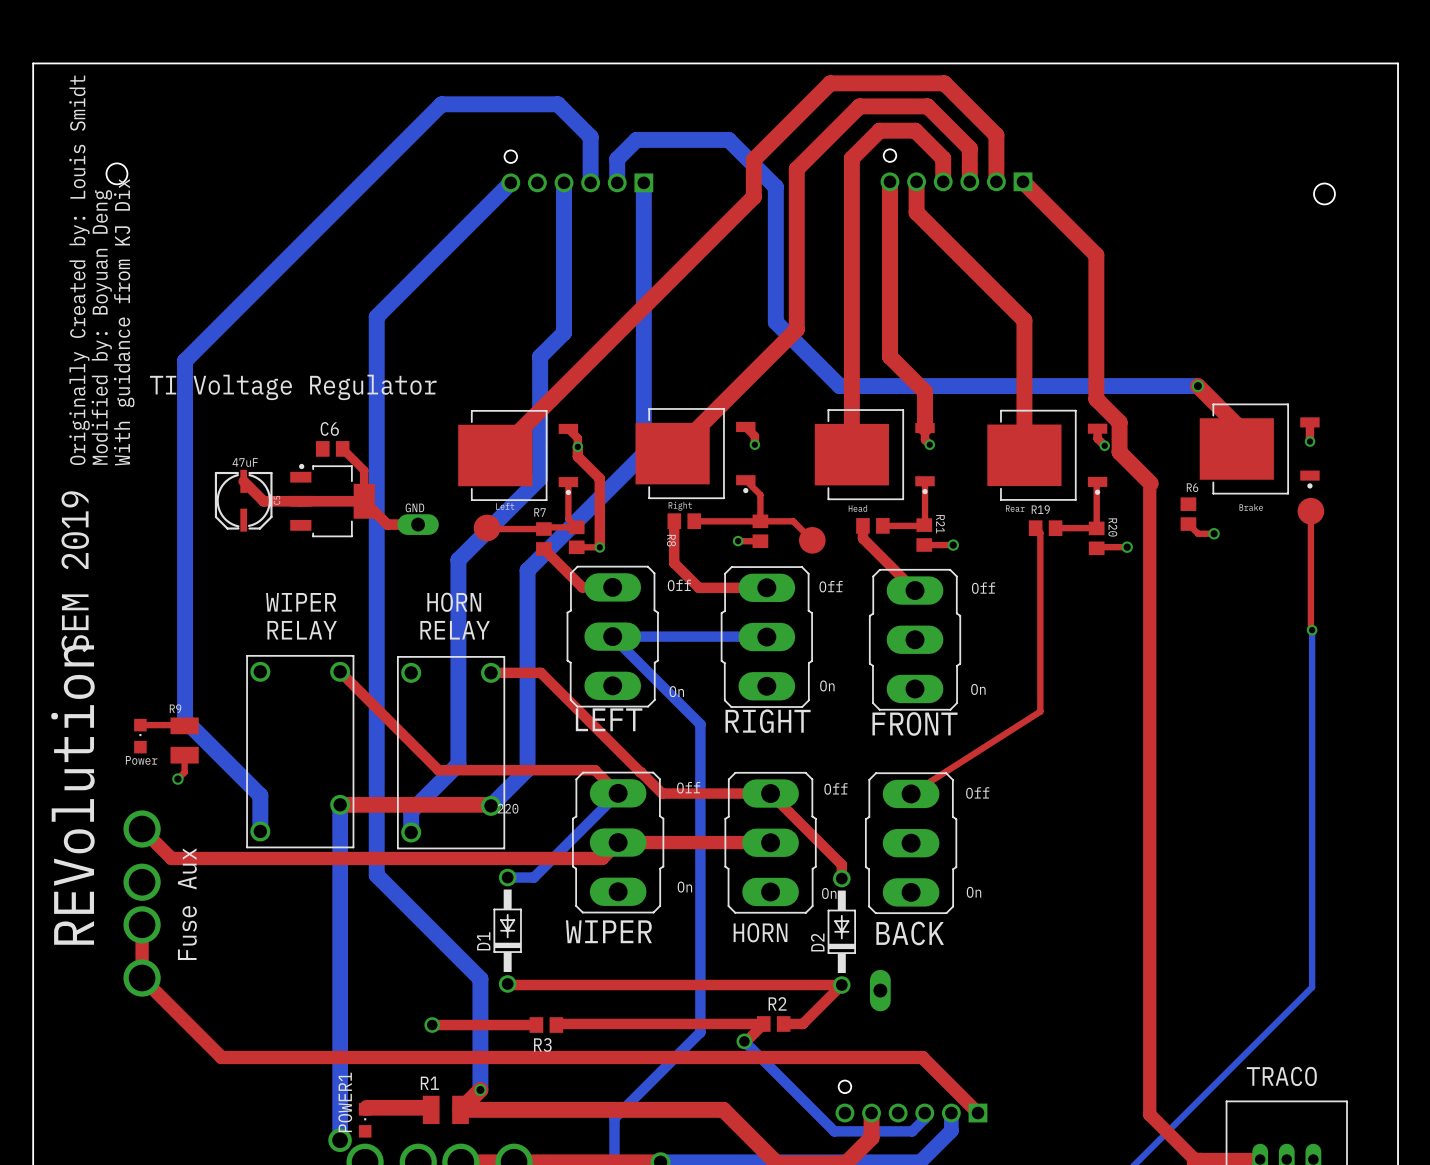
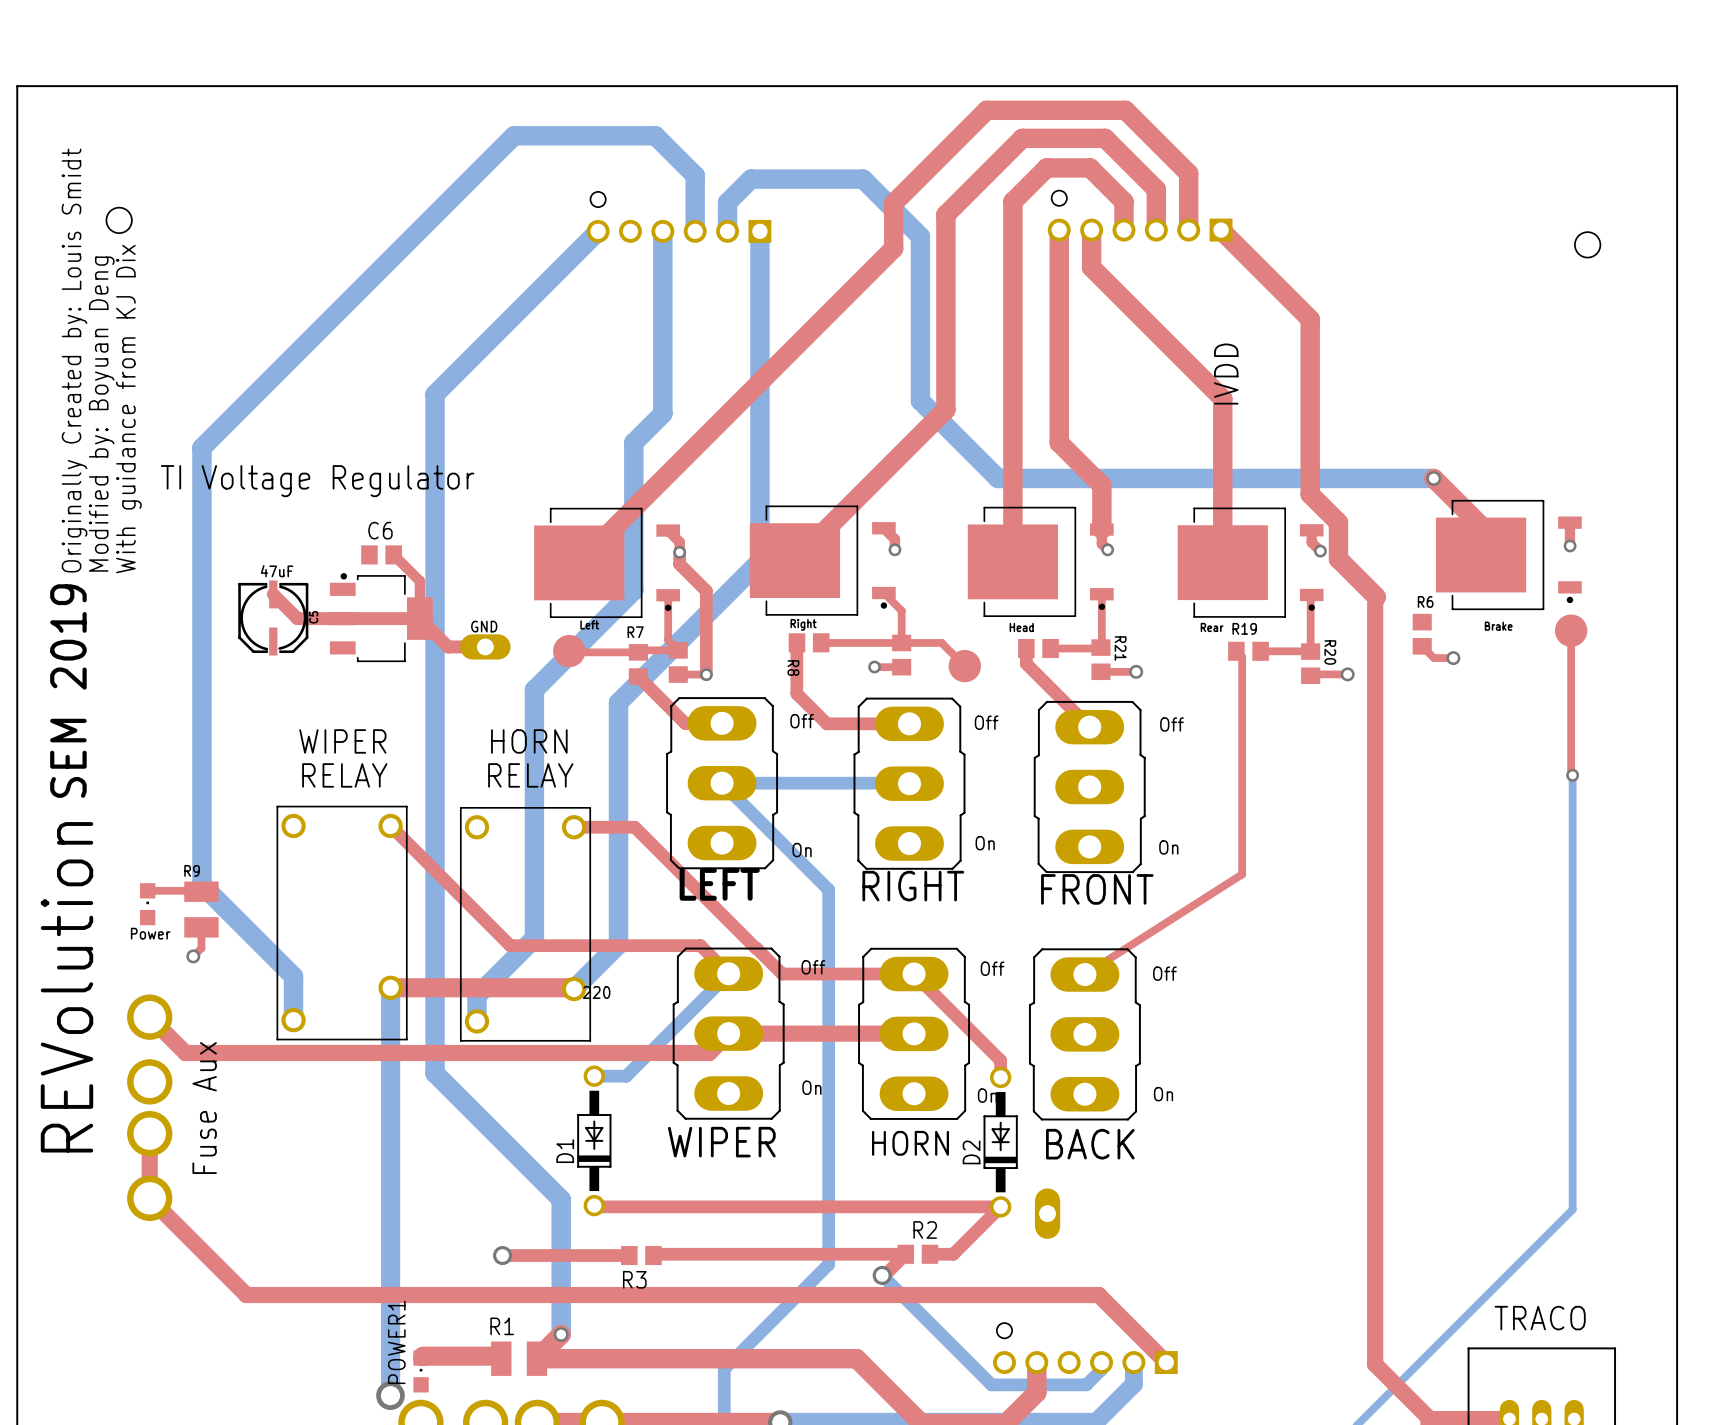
text: none -> IVDD (1226, 374)

